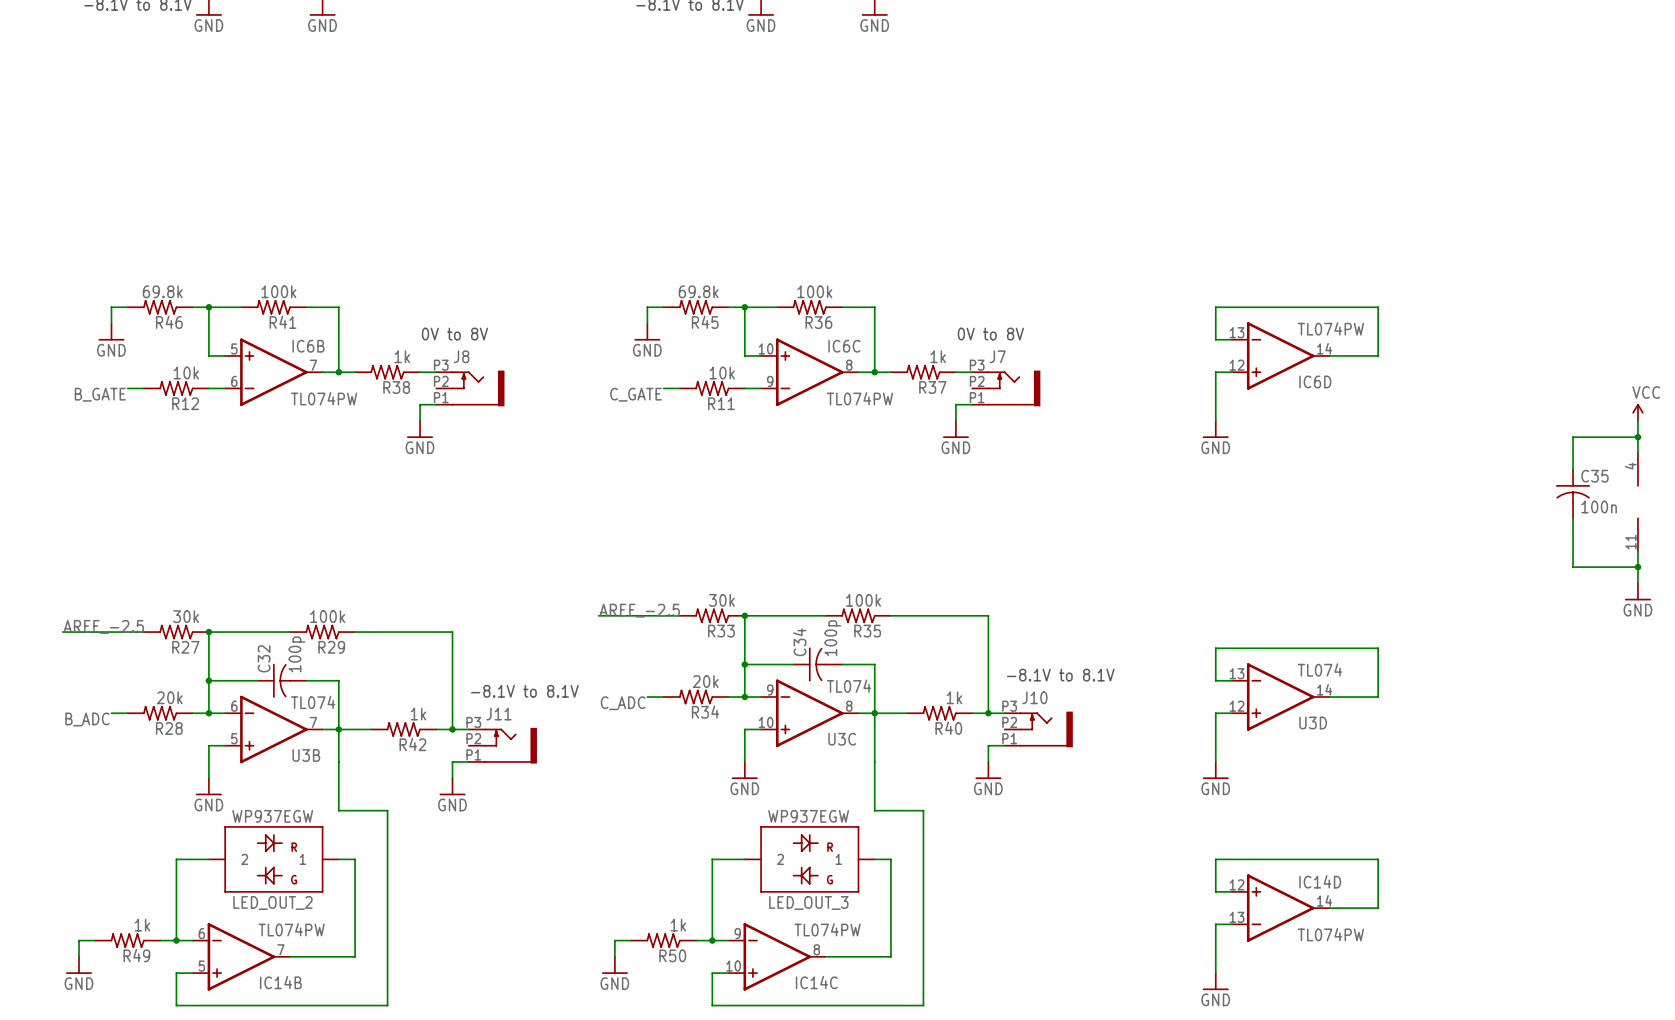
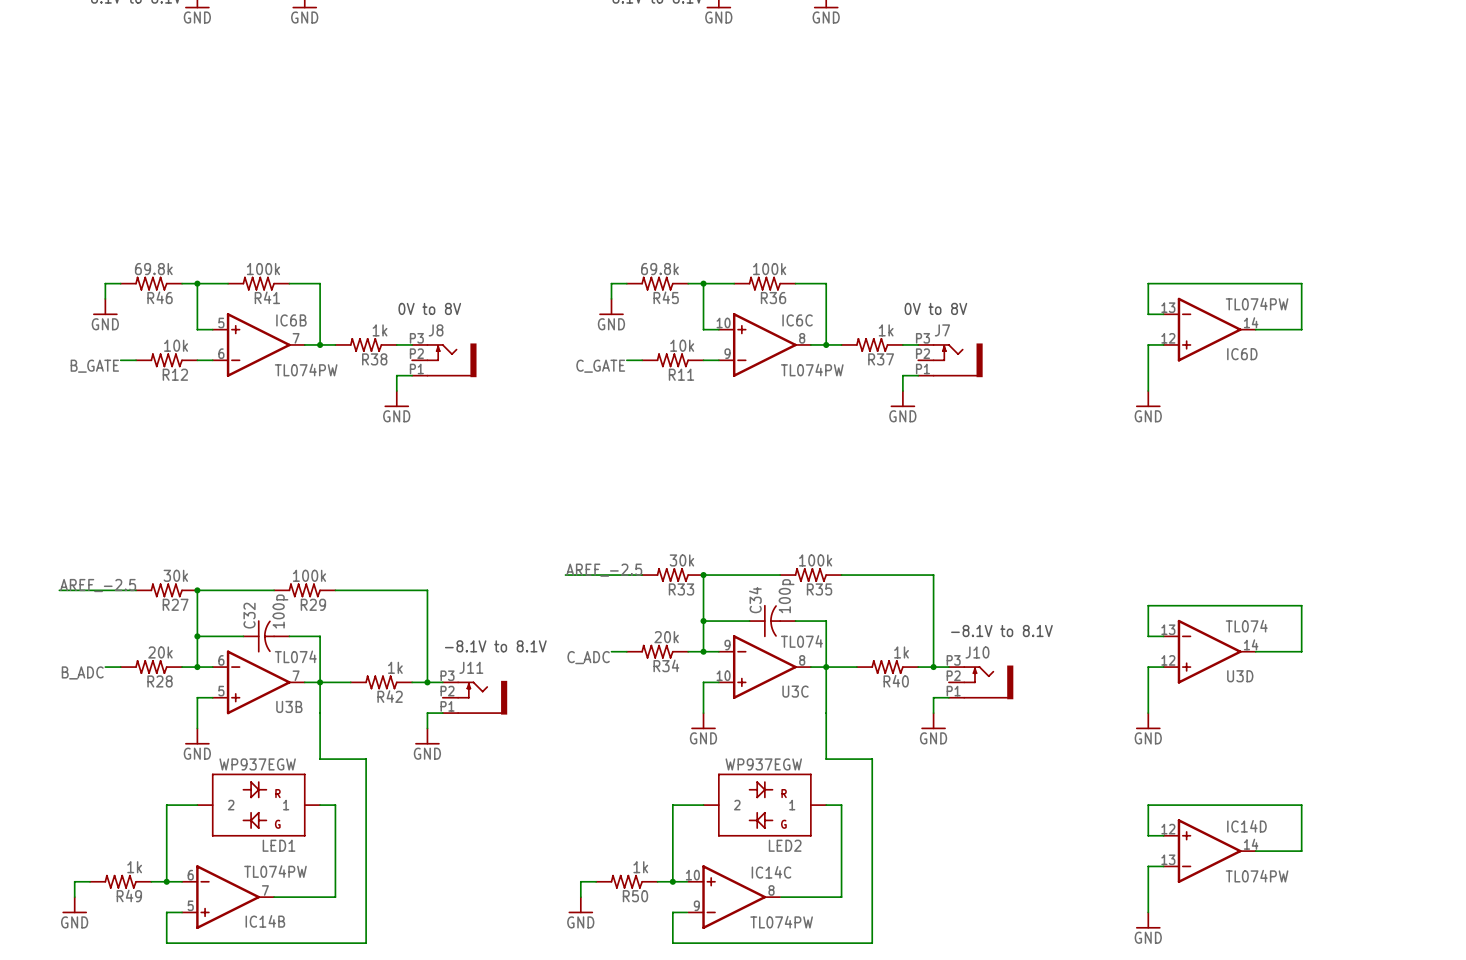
LED_OUT_2 name: LED_OUT_2 (272, 902) -> LED1 (279, 845)
LED_OUT_3 name: LED_OUT_3 (808, 902) -> LED2 (785, 845)
IC14C flip: as is (777, 956) -> up-down (734, 897)

